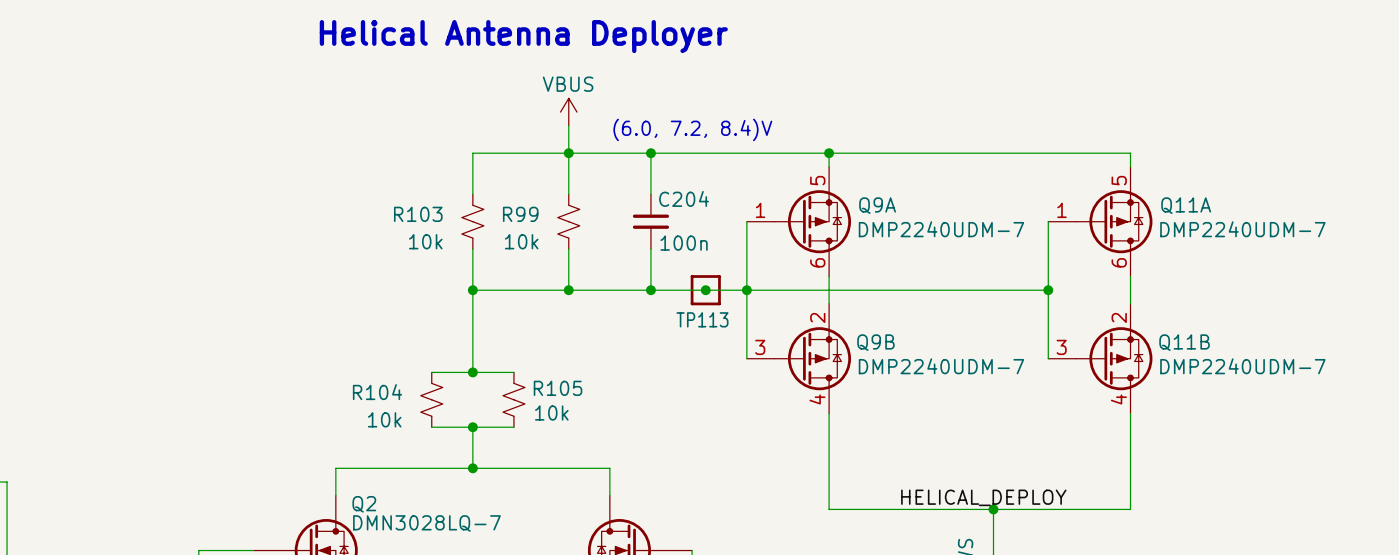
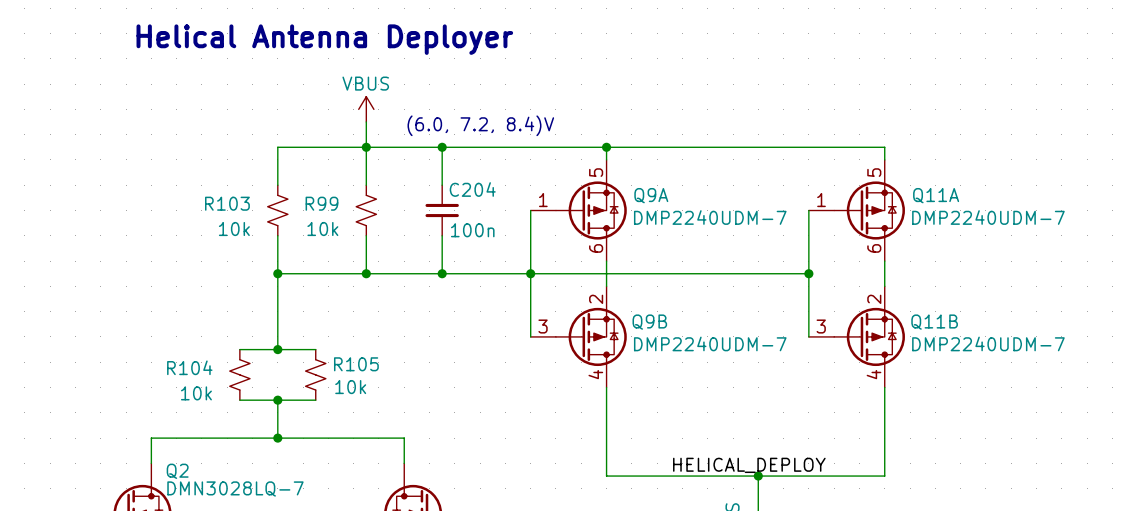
junction: (705, 290) -> none
TP113: (705, 290) -> none

